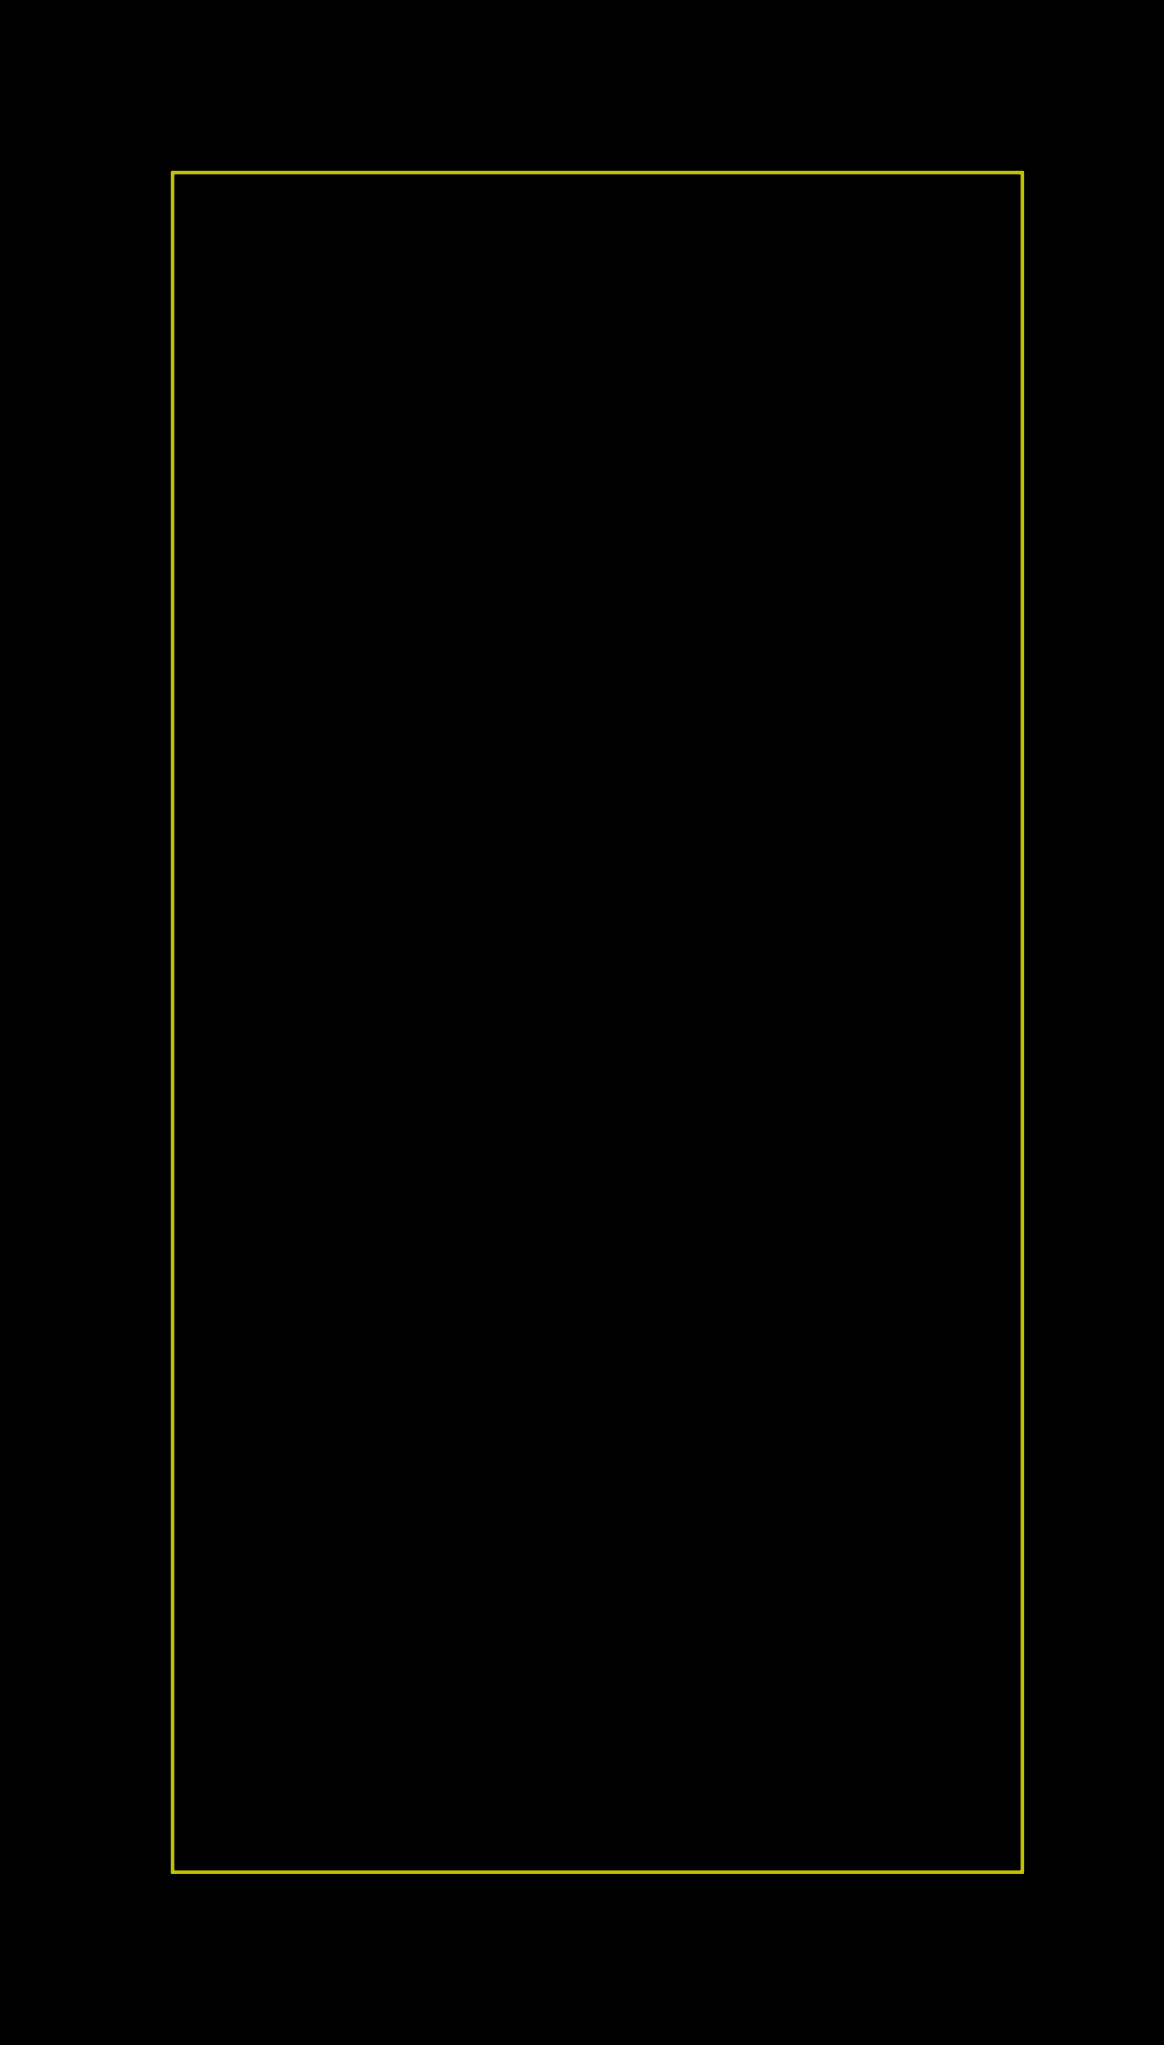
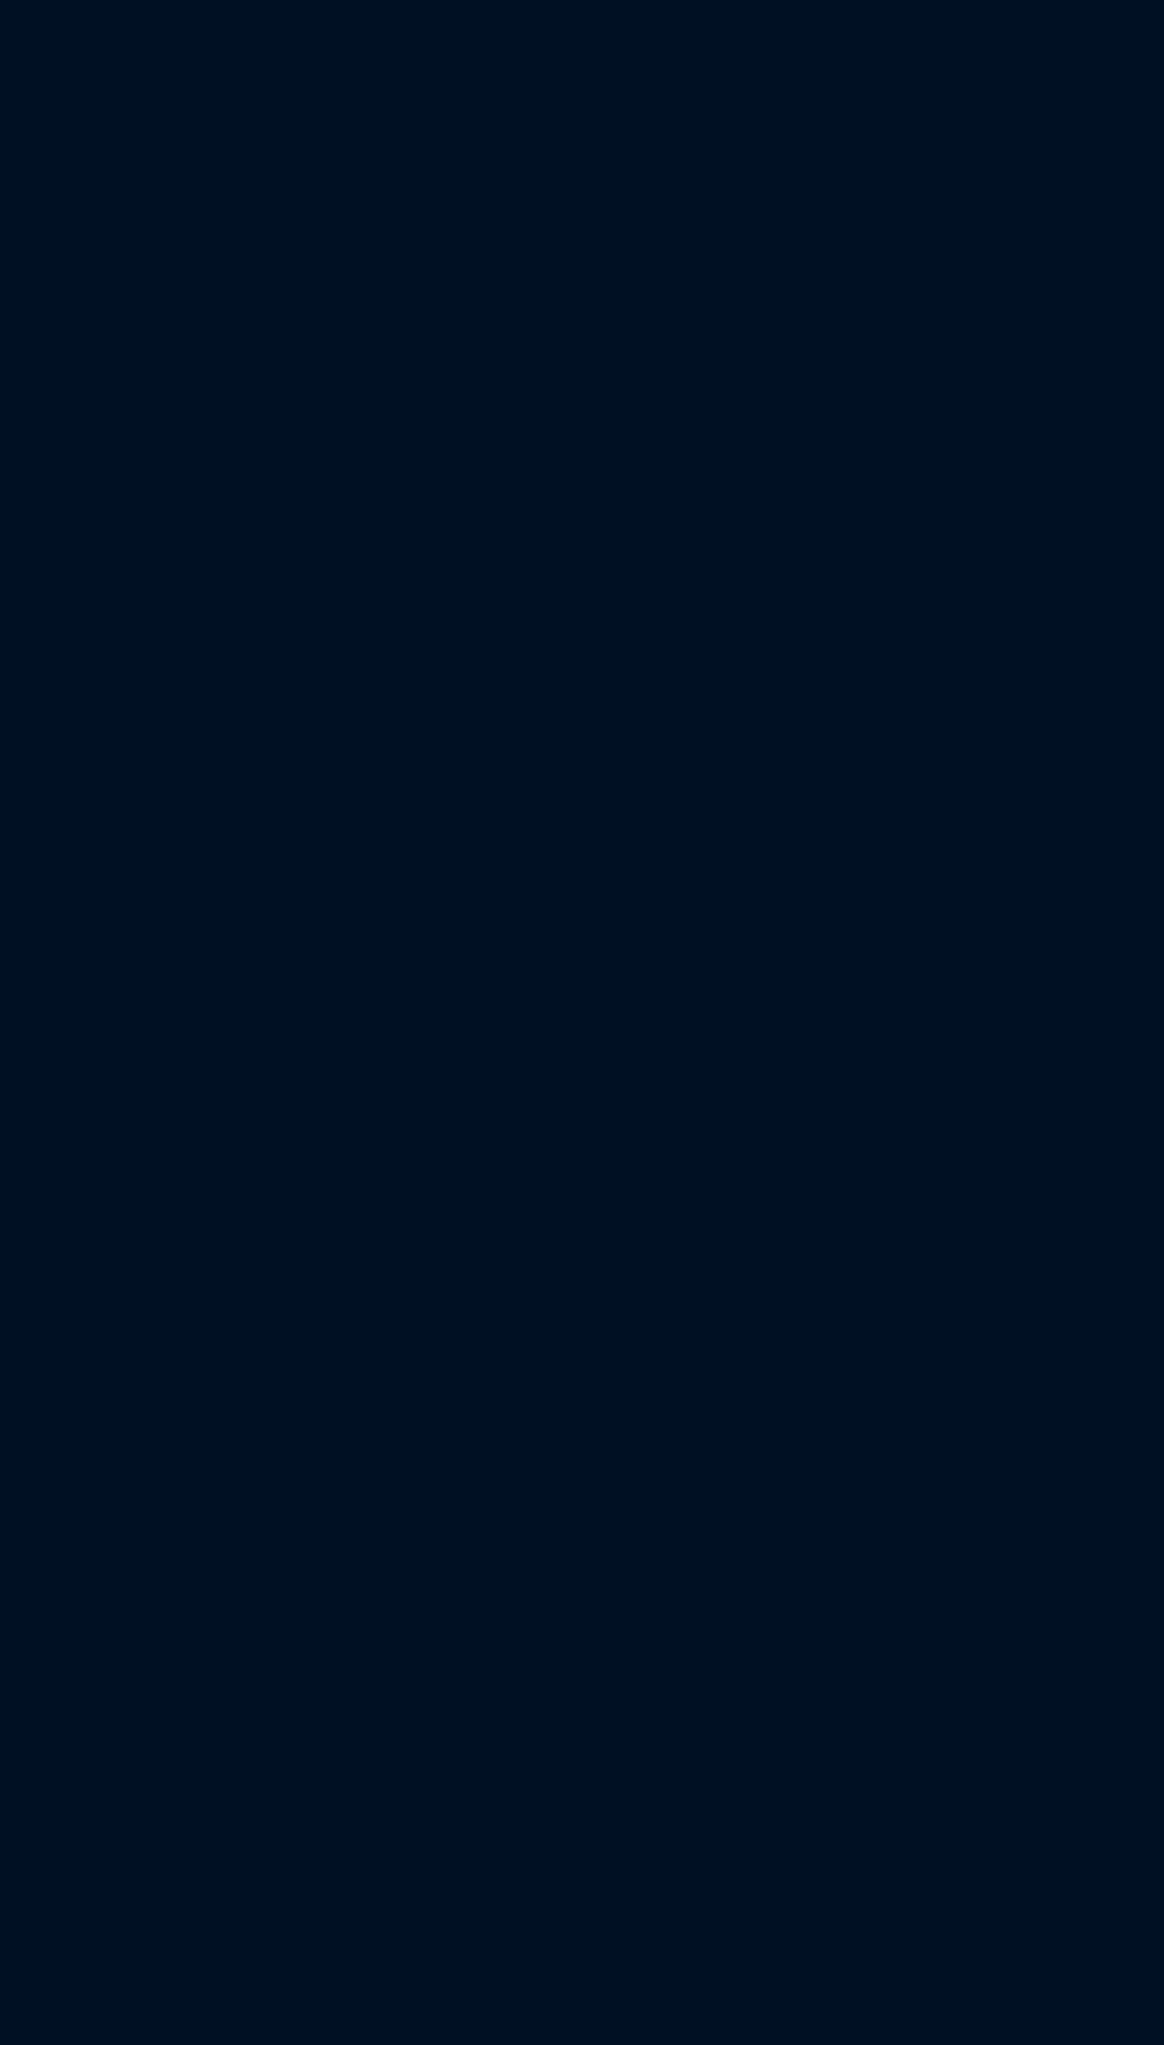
board edge: (1022, 172) (172, 172) (172, 1872) (1022, 1872) (1022, 172) -> none

